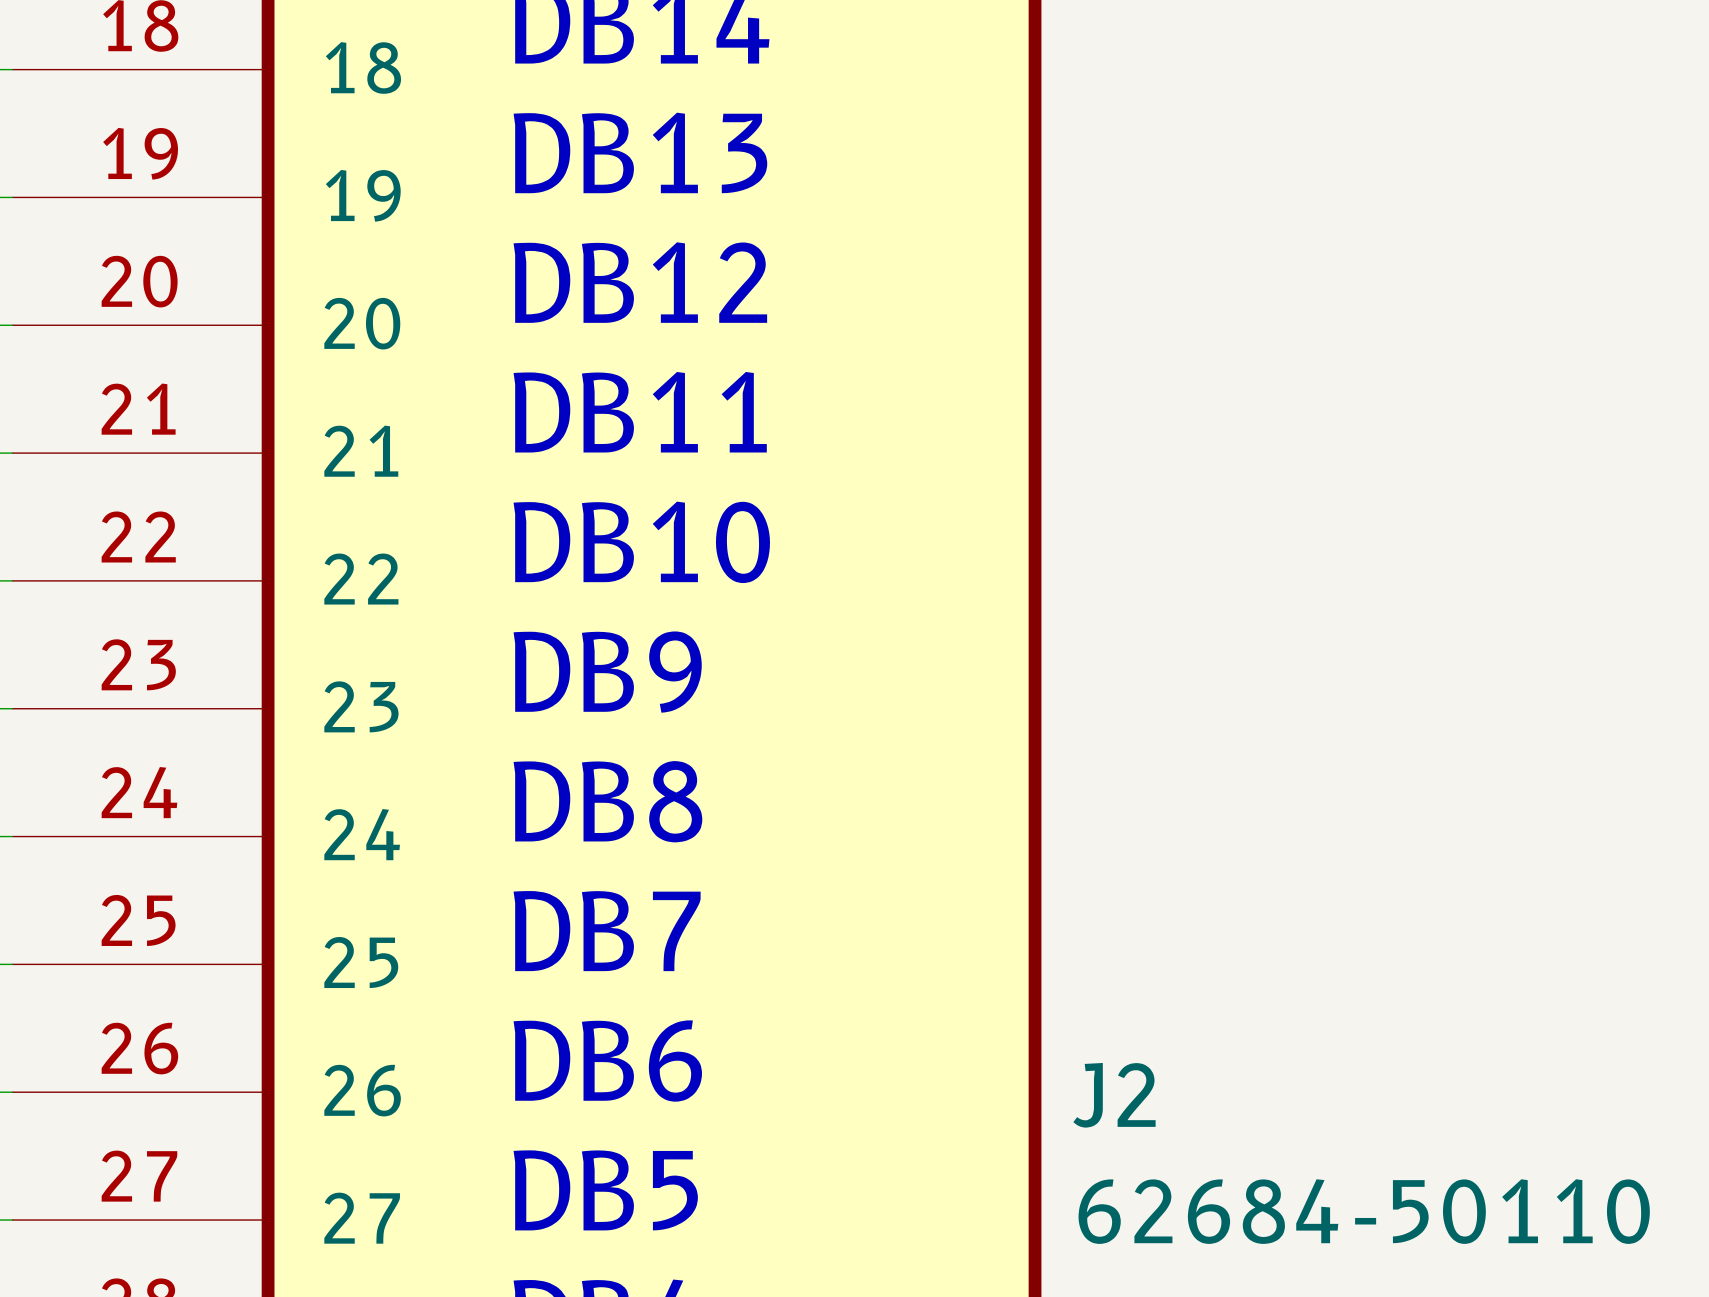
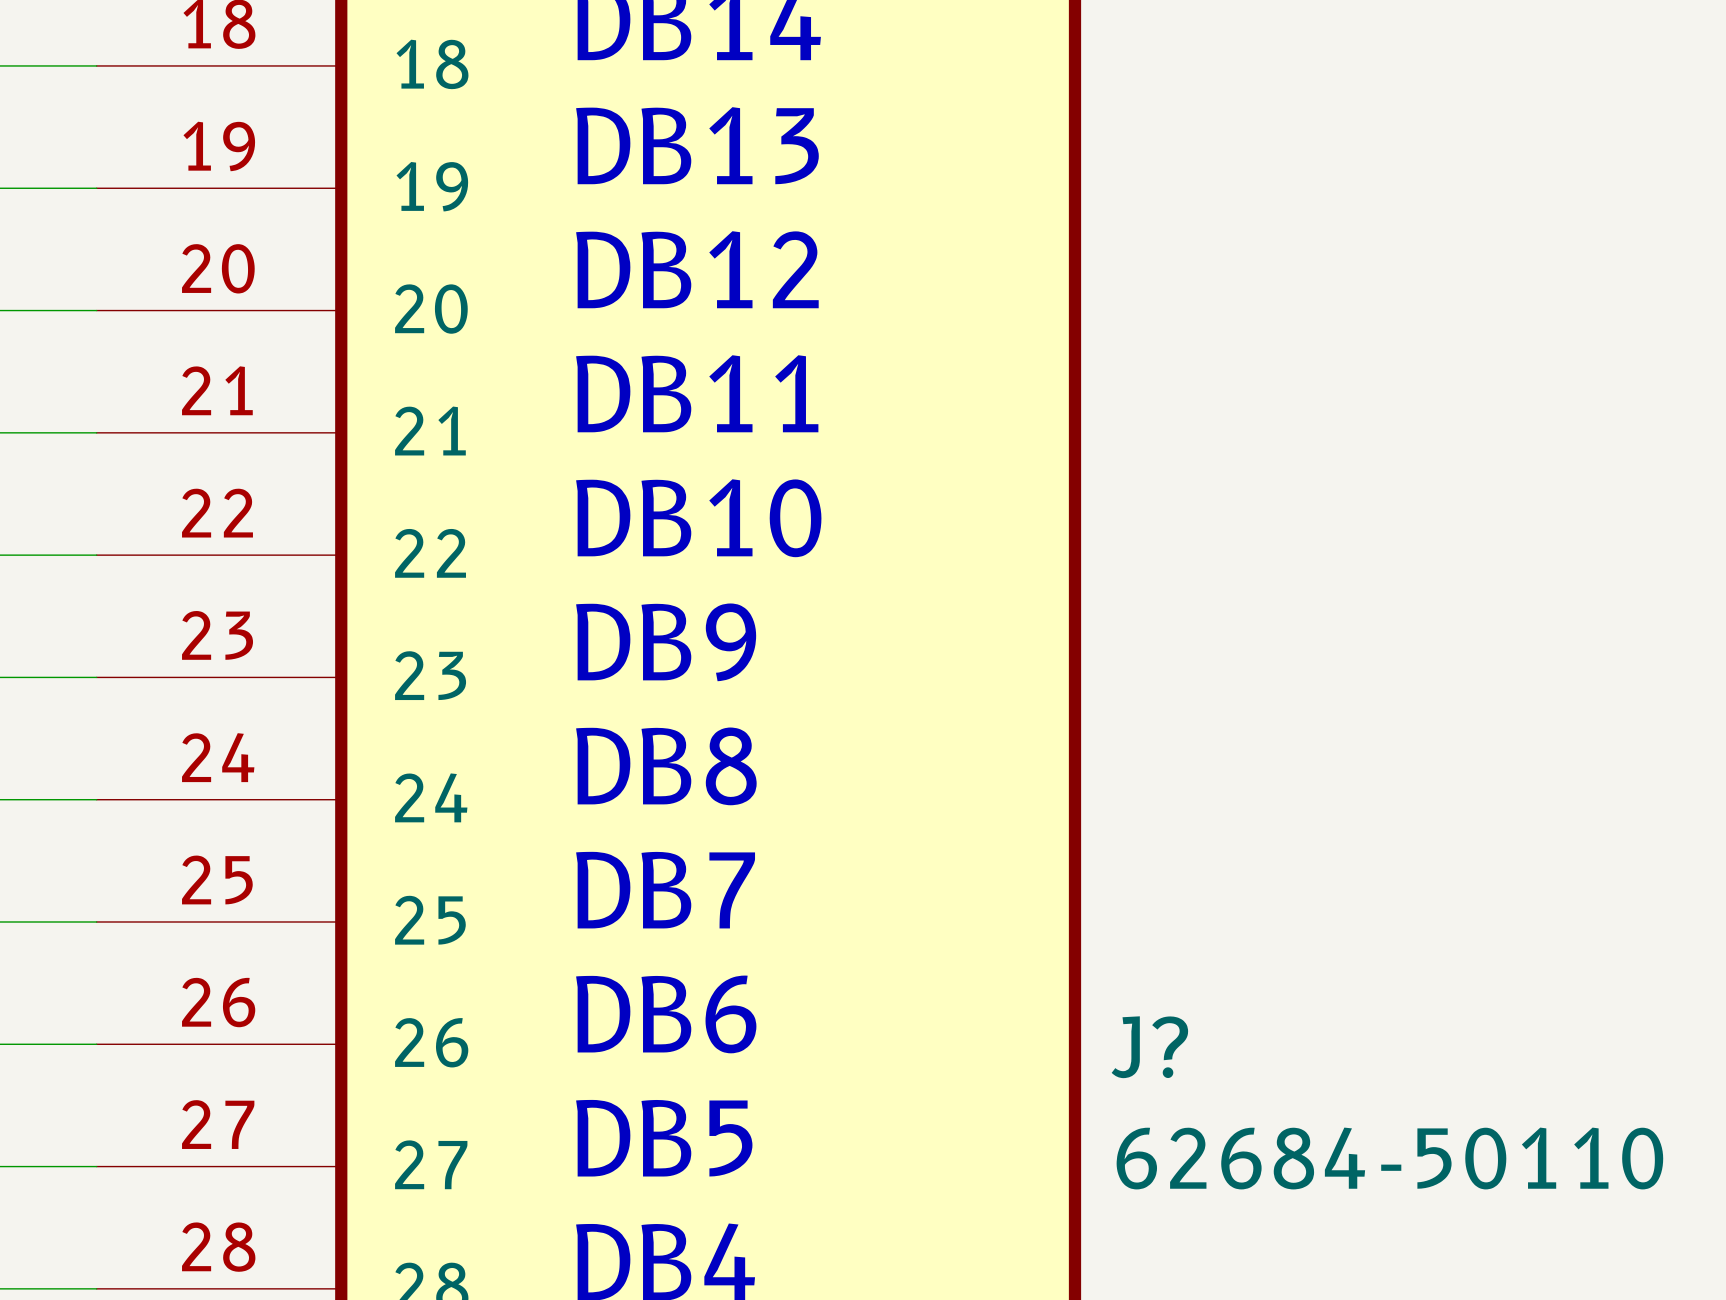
J2 name: J2 (1114, 1095) -> J? (1149, 1047)

